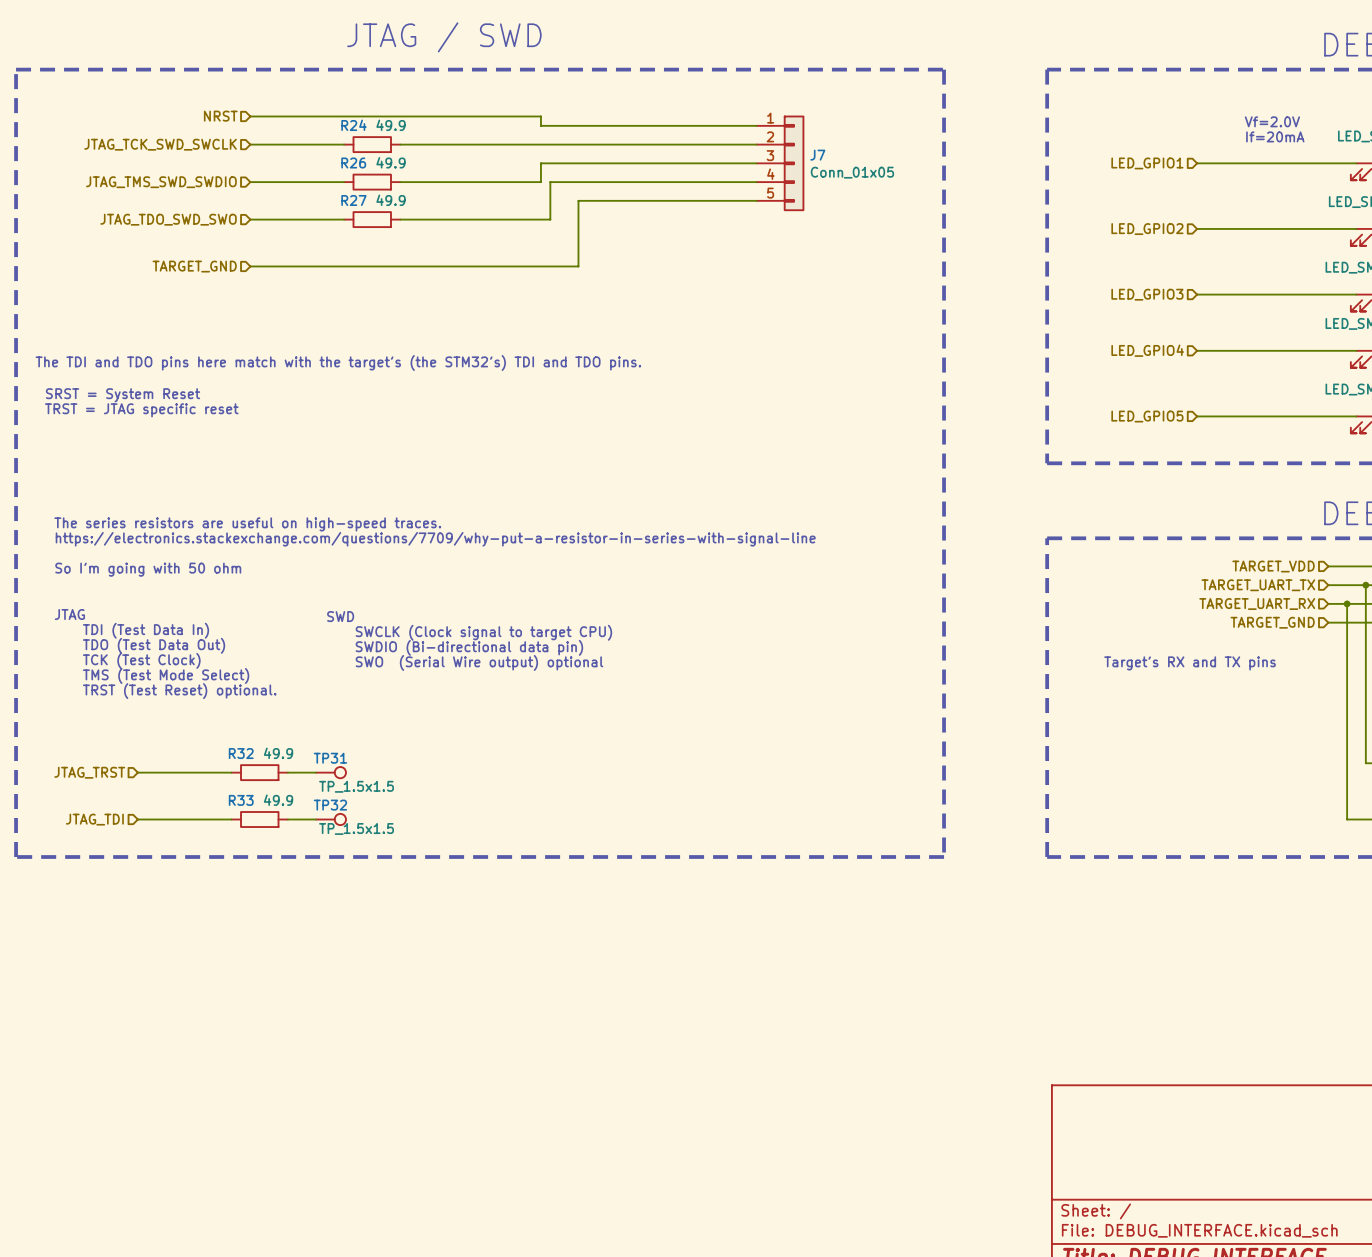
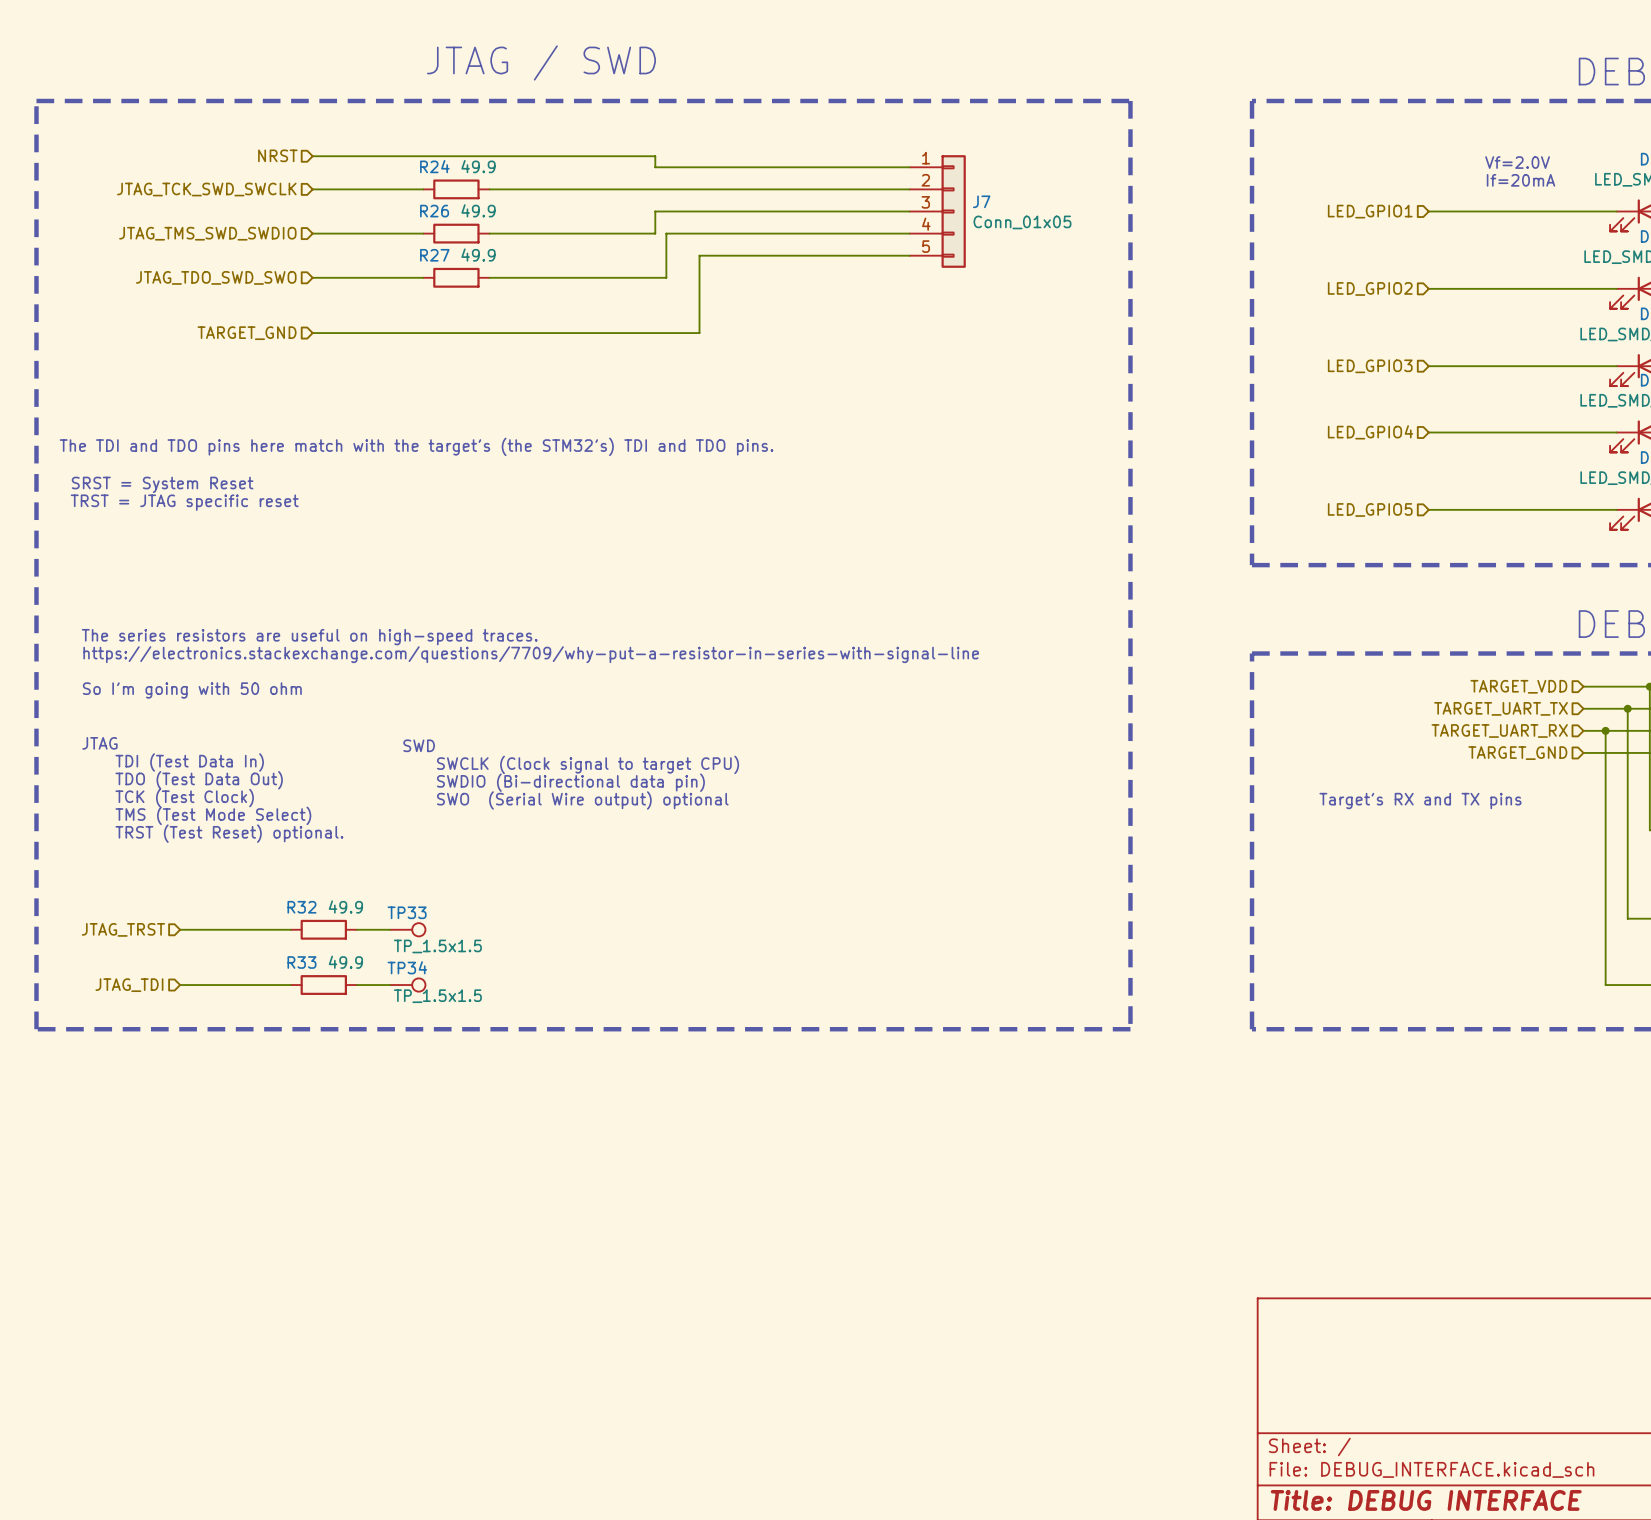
TP31 name: TP31 (330, 758) -> TP33 (407, 912)
TP32 name: TP32 (330, 805) -> TP34 (407, 967)

